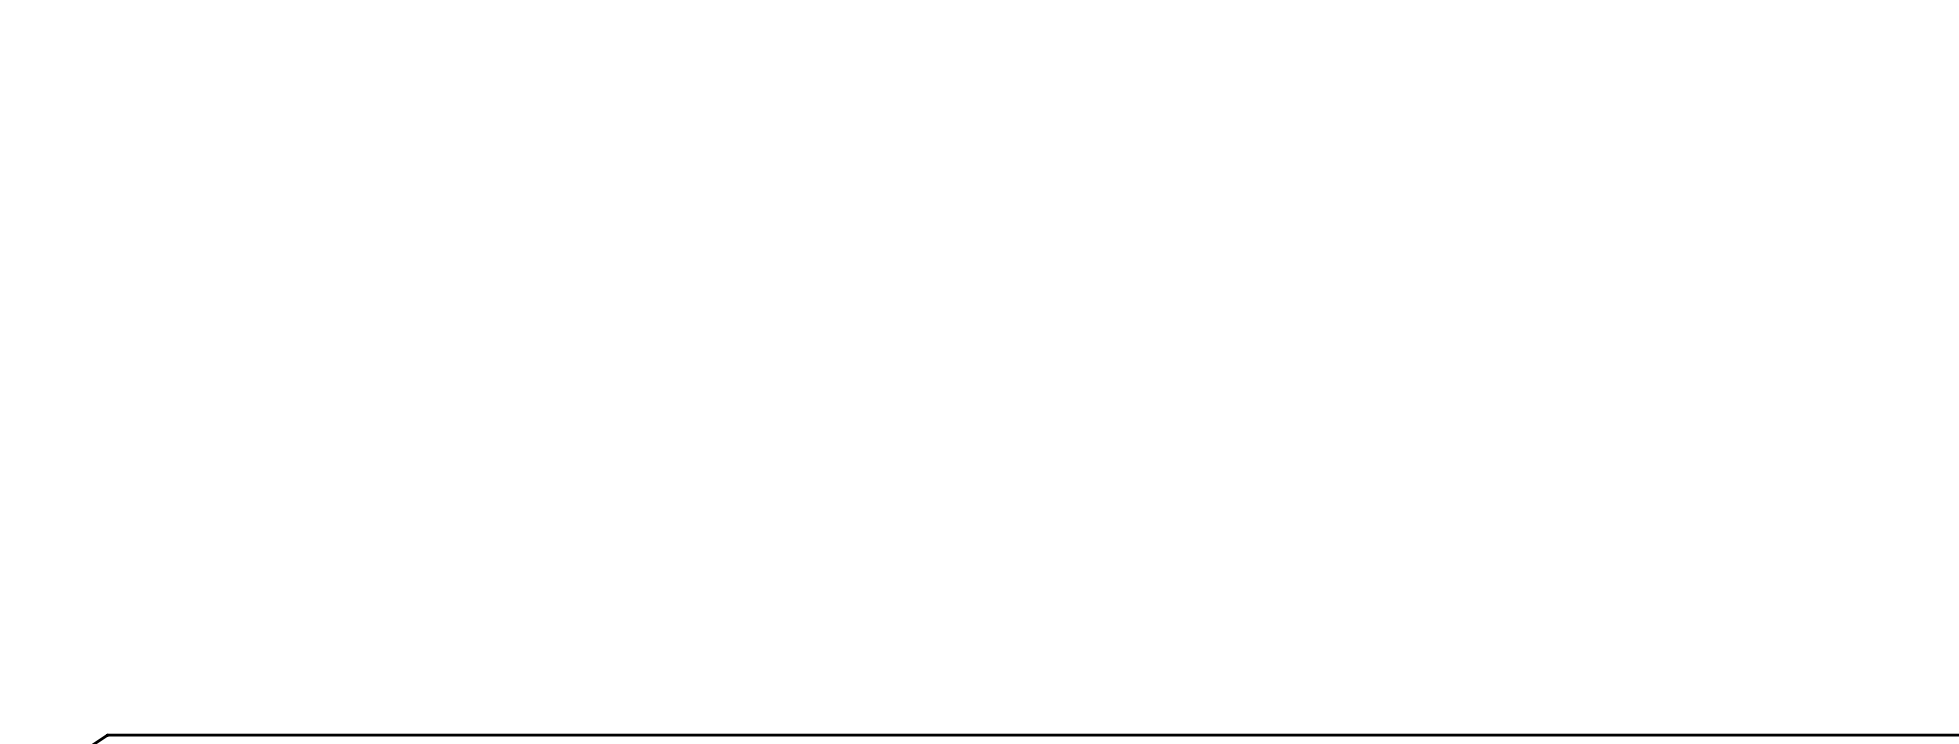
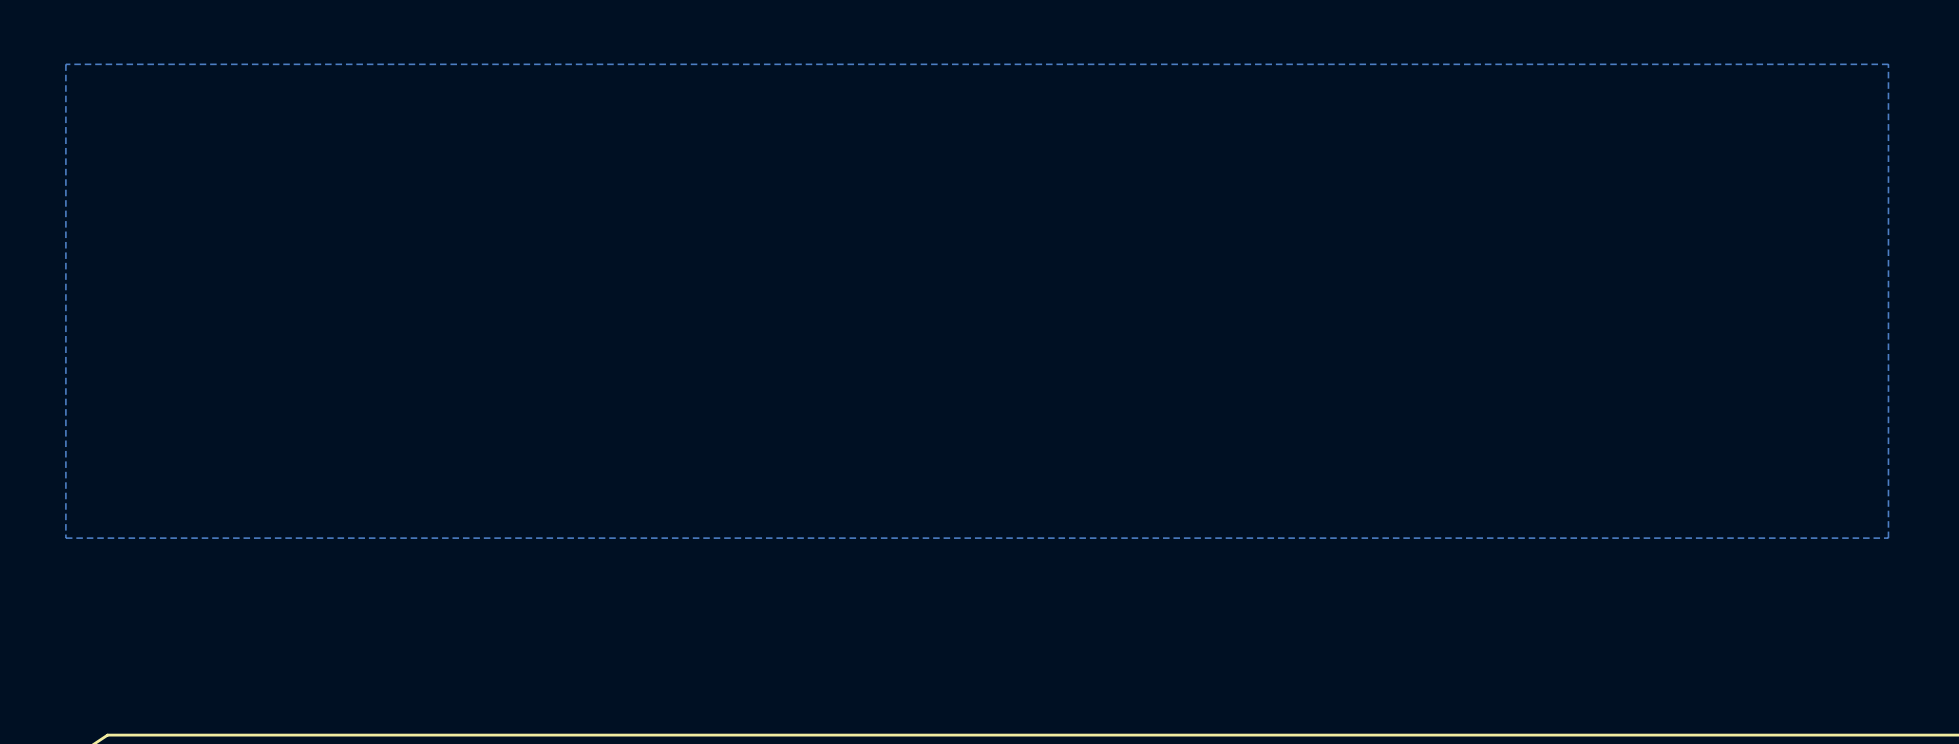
zone outline: none -> (1888, 64) (65, 64) (65, 538) (1888, 538) (1888, 64)

